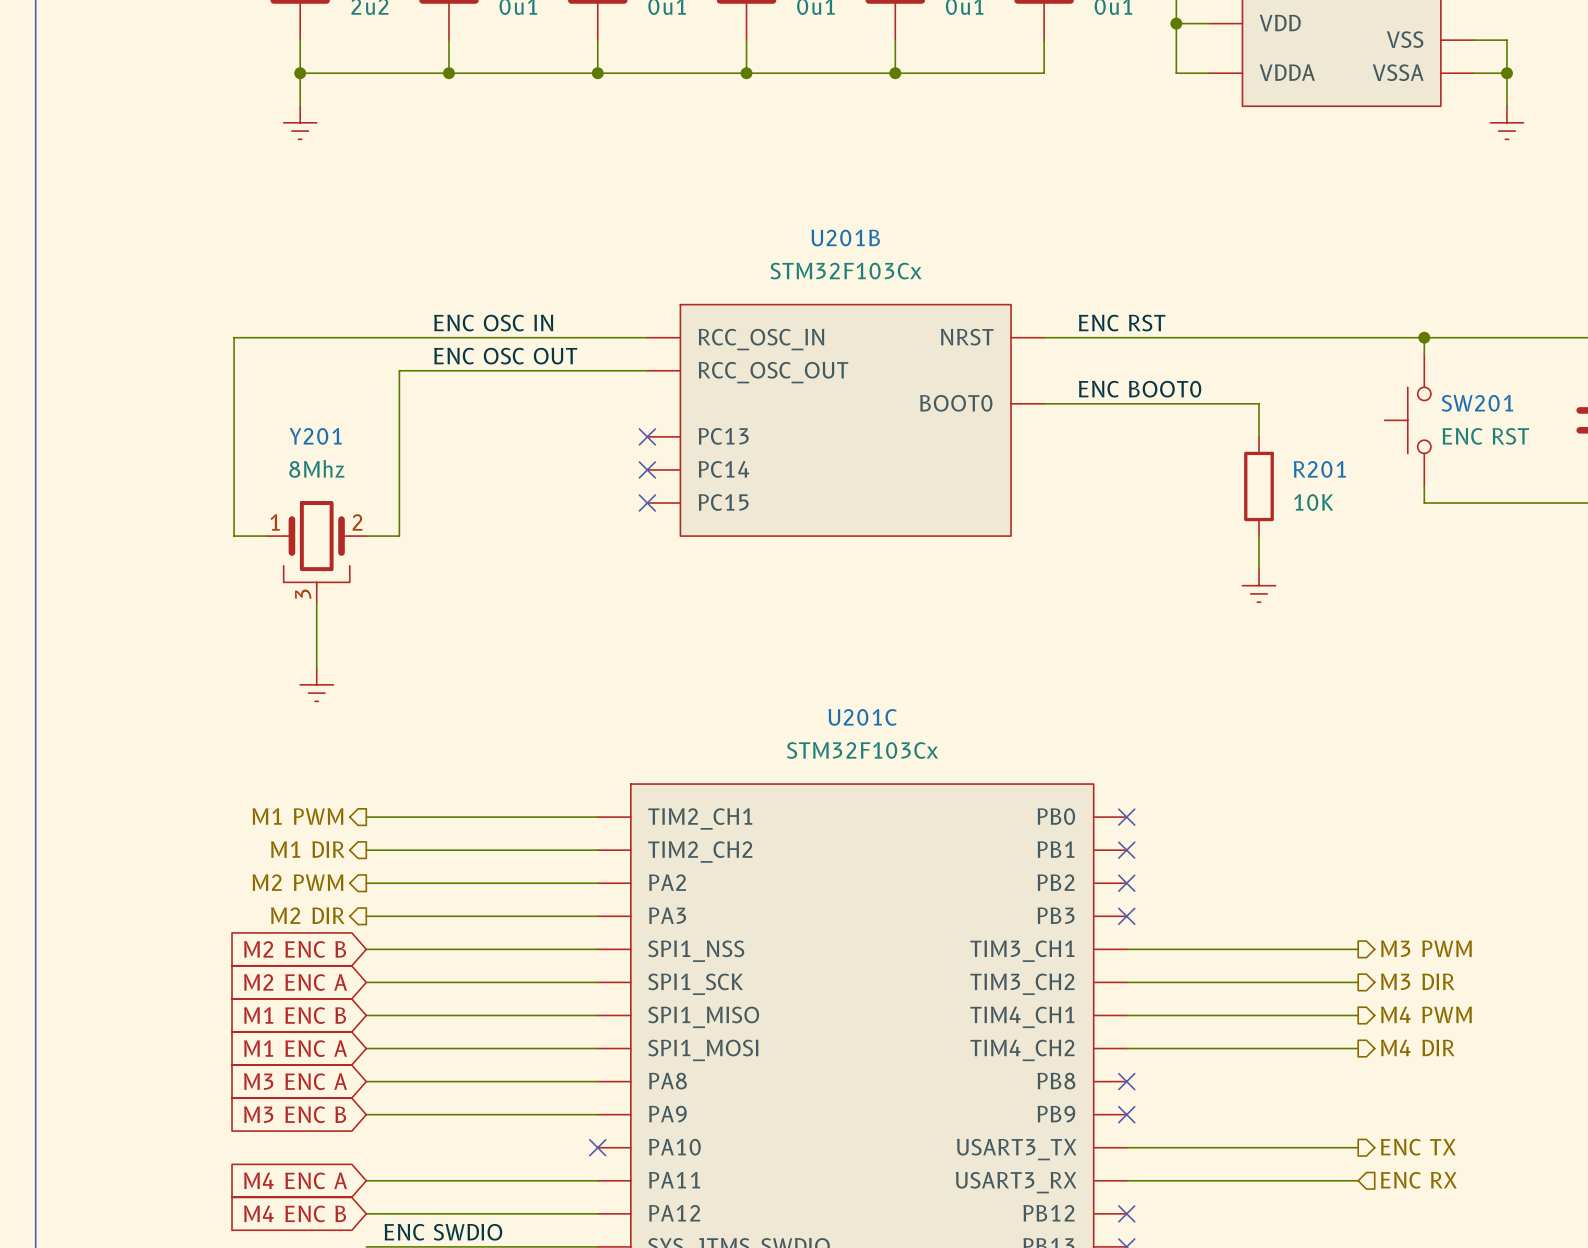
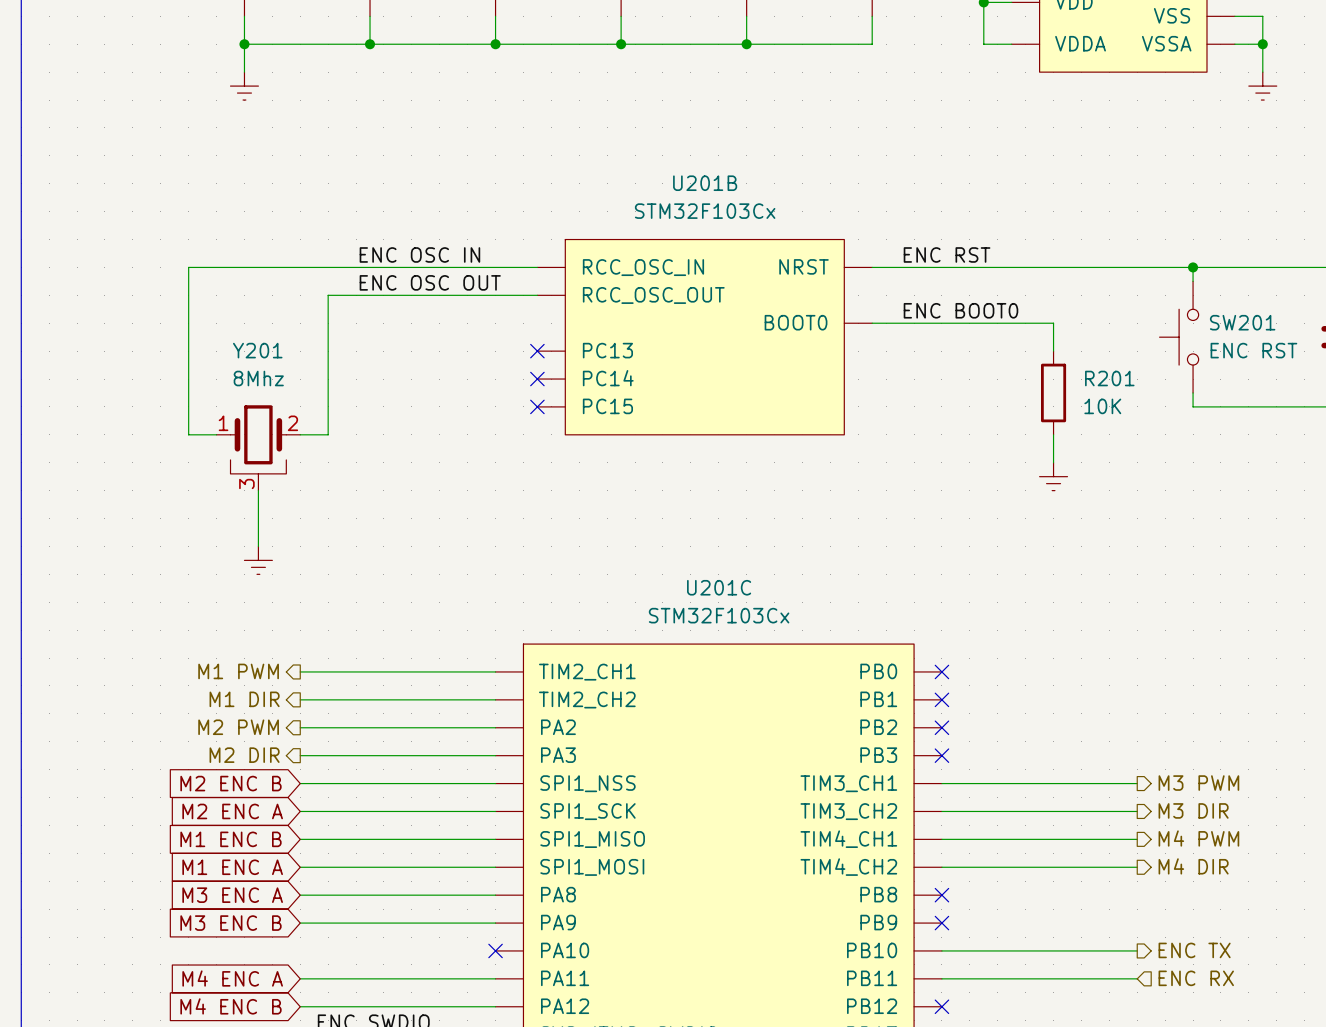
U201C pin name: USART3_TX (1016, 1149) -> PB10 (872, 950)
U201C pin name: USART3_RX (1016, 1182) -> PB11 (872, 978)

